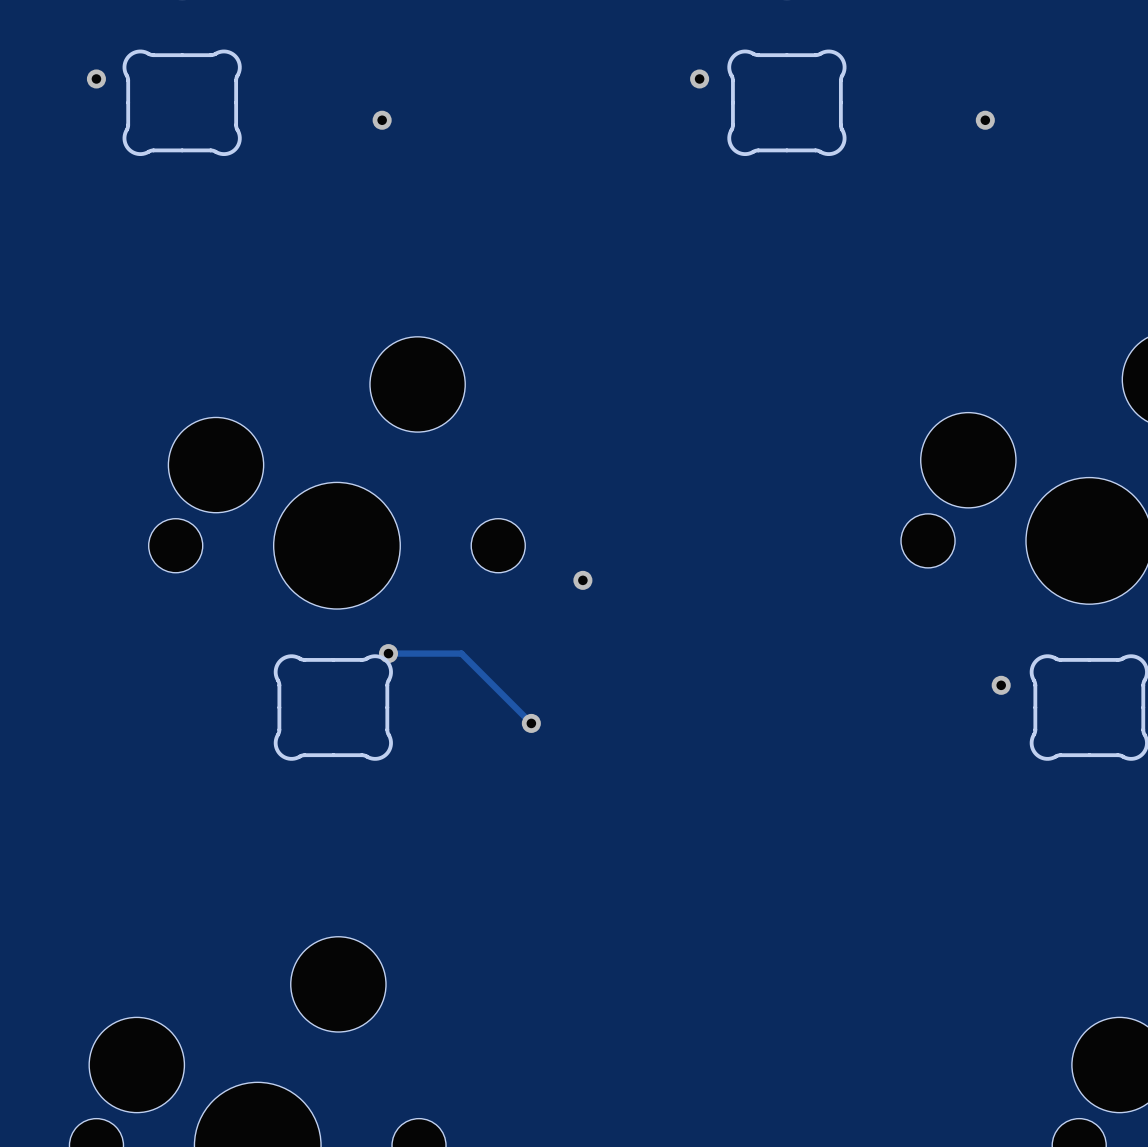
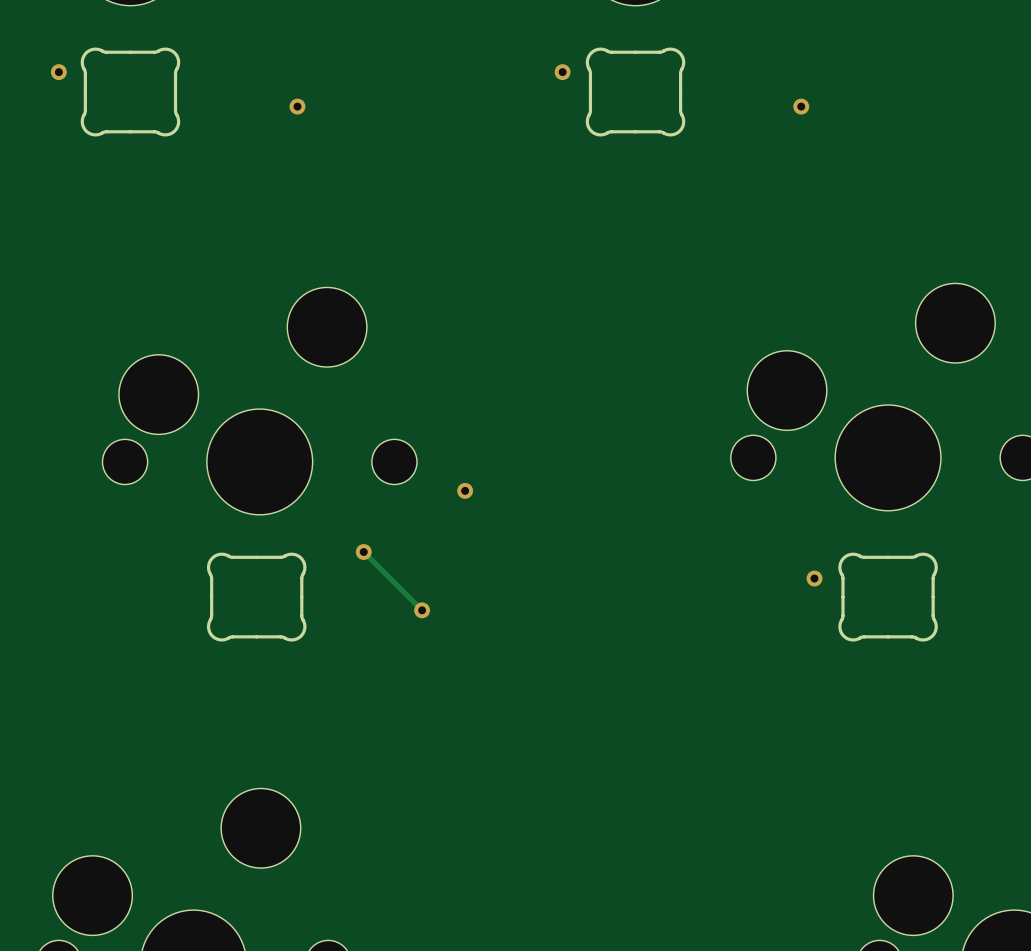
track: (388, 653) (461, 653) -> none
via position: (388, 653) -> (363, 552)

